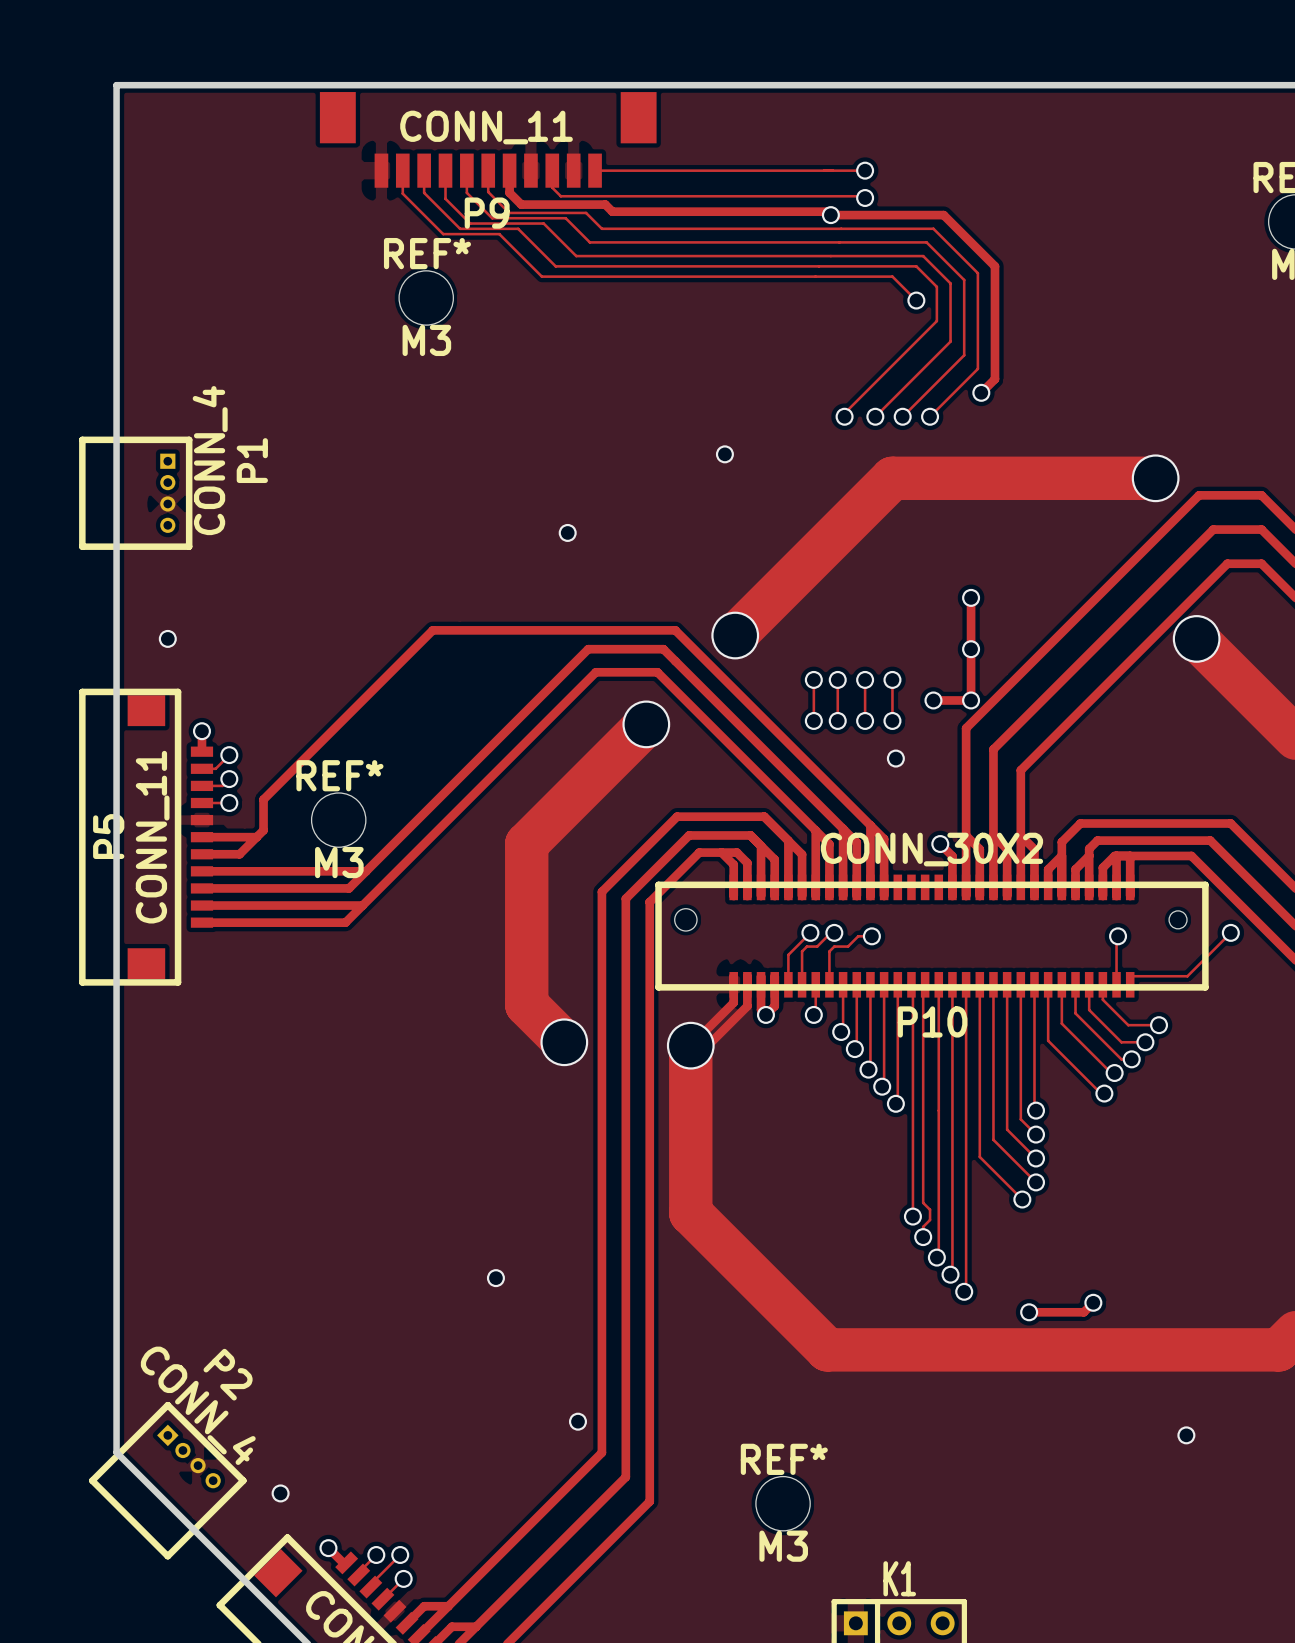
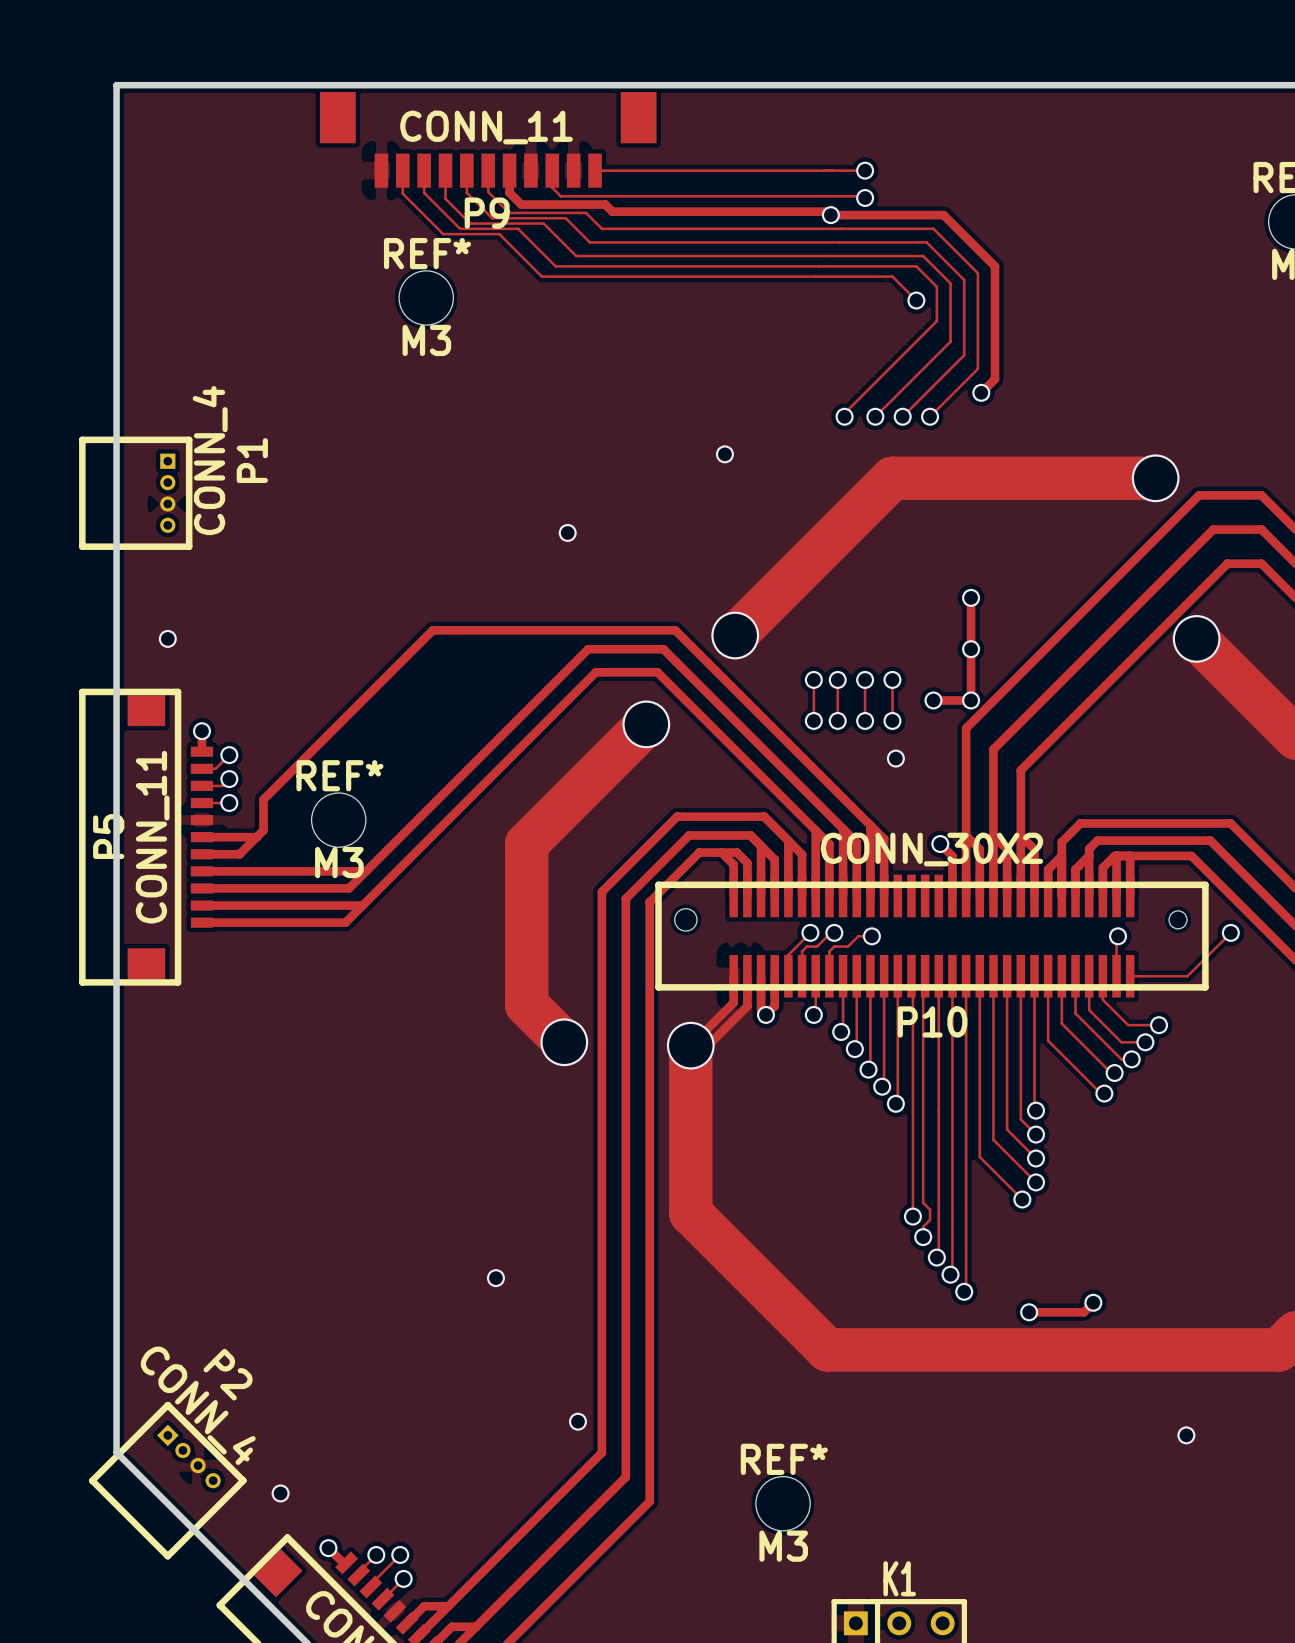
P10 footprint: [655, 874, 1209, 998] -> [655, 874, 1209, 998]

